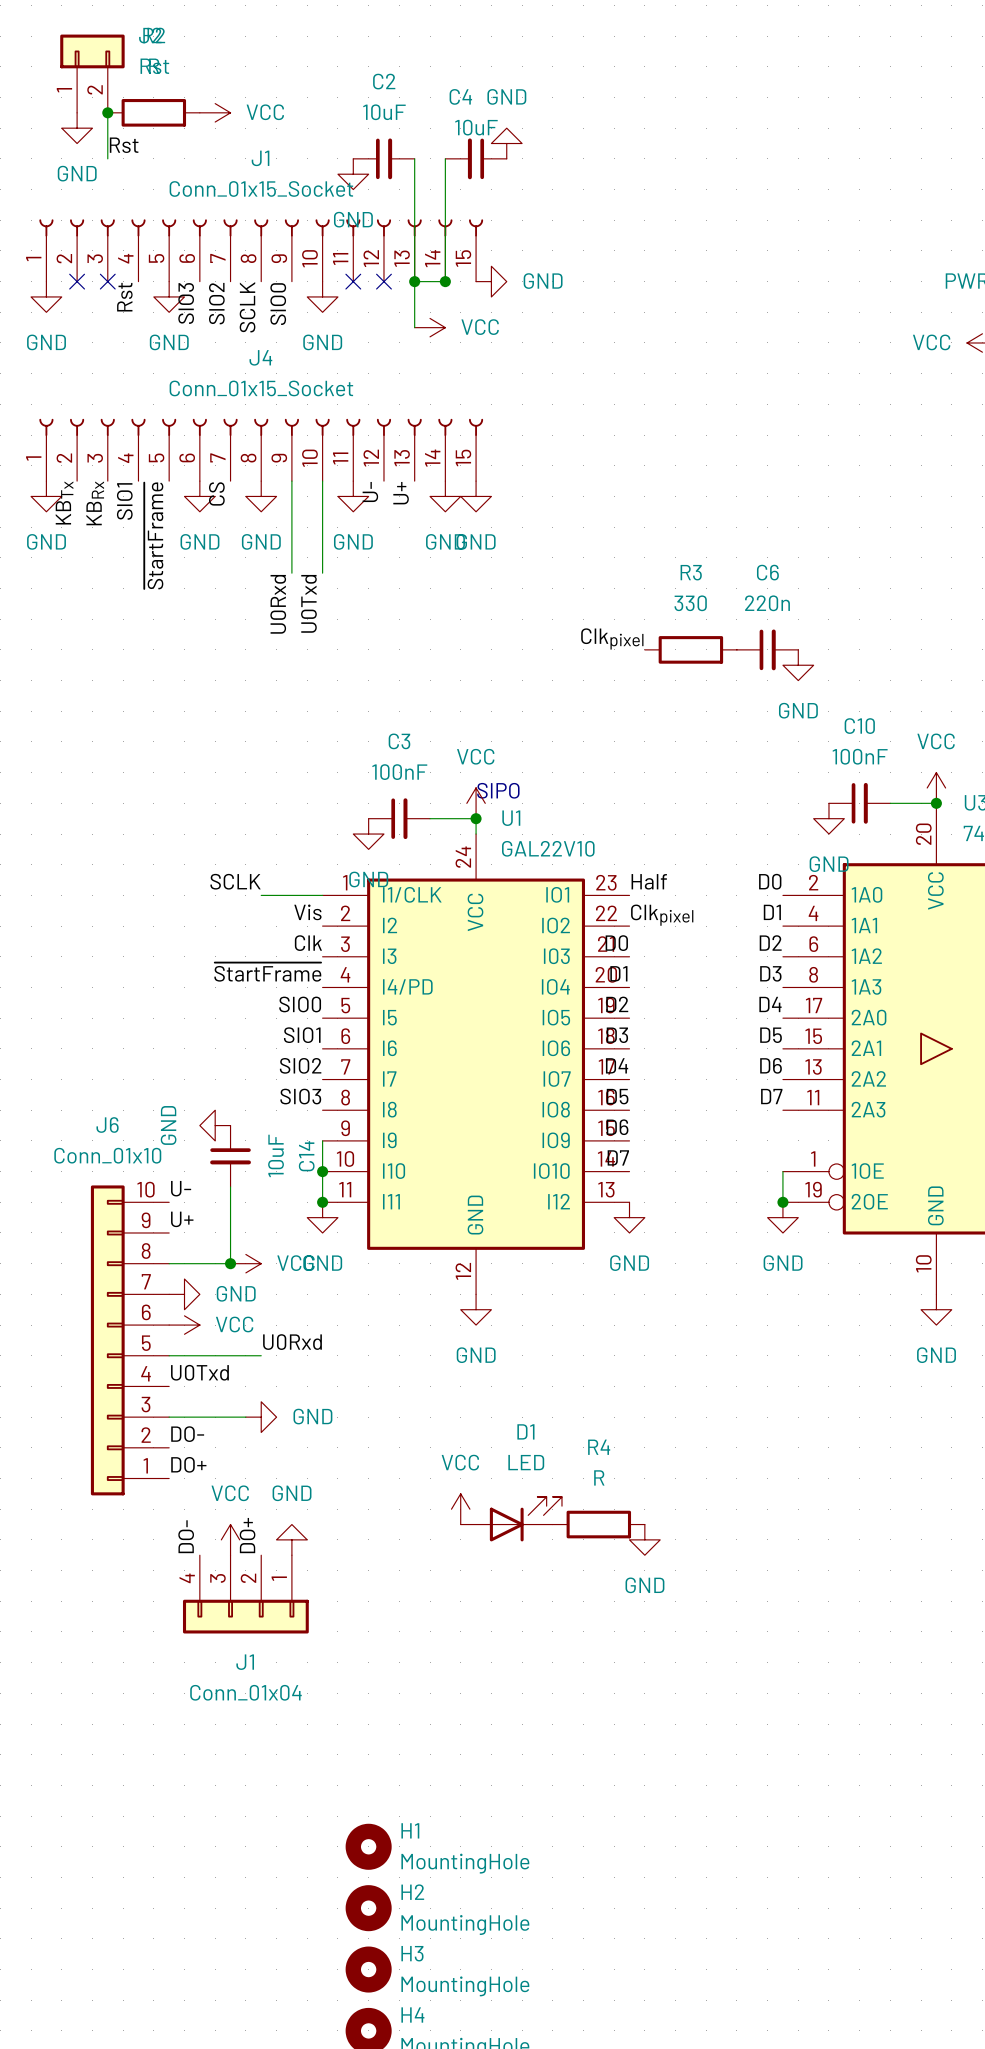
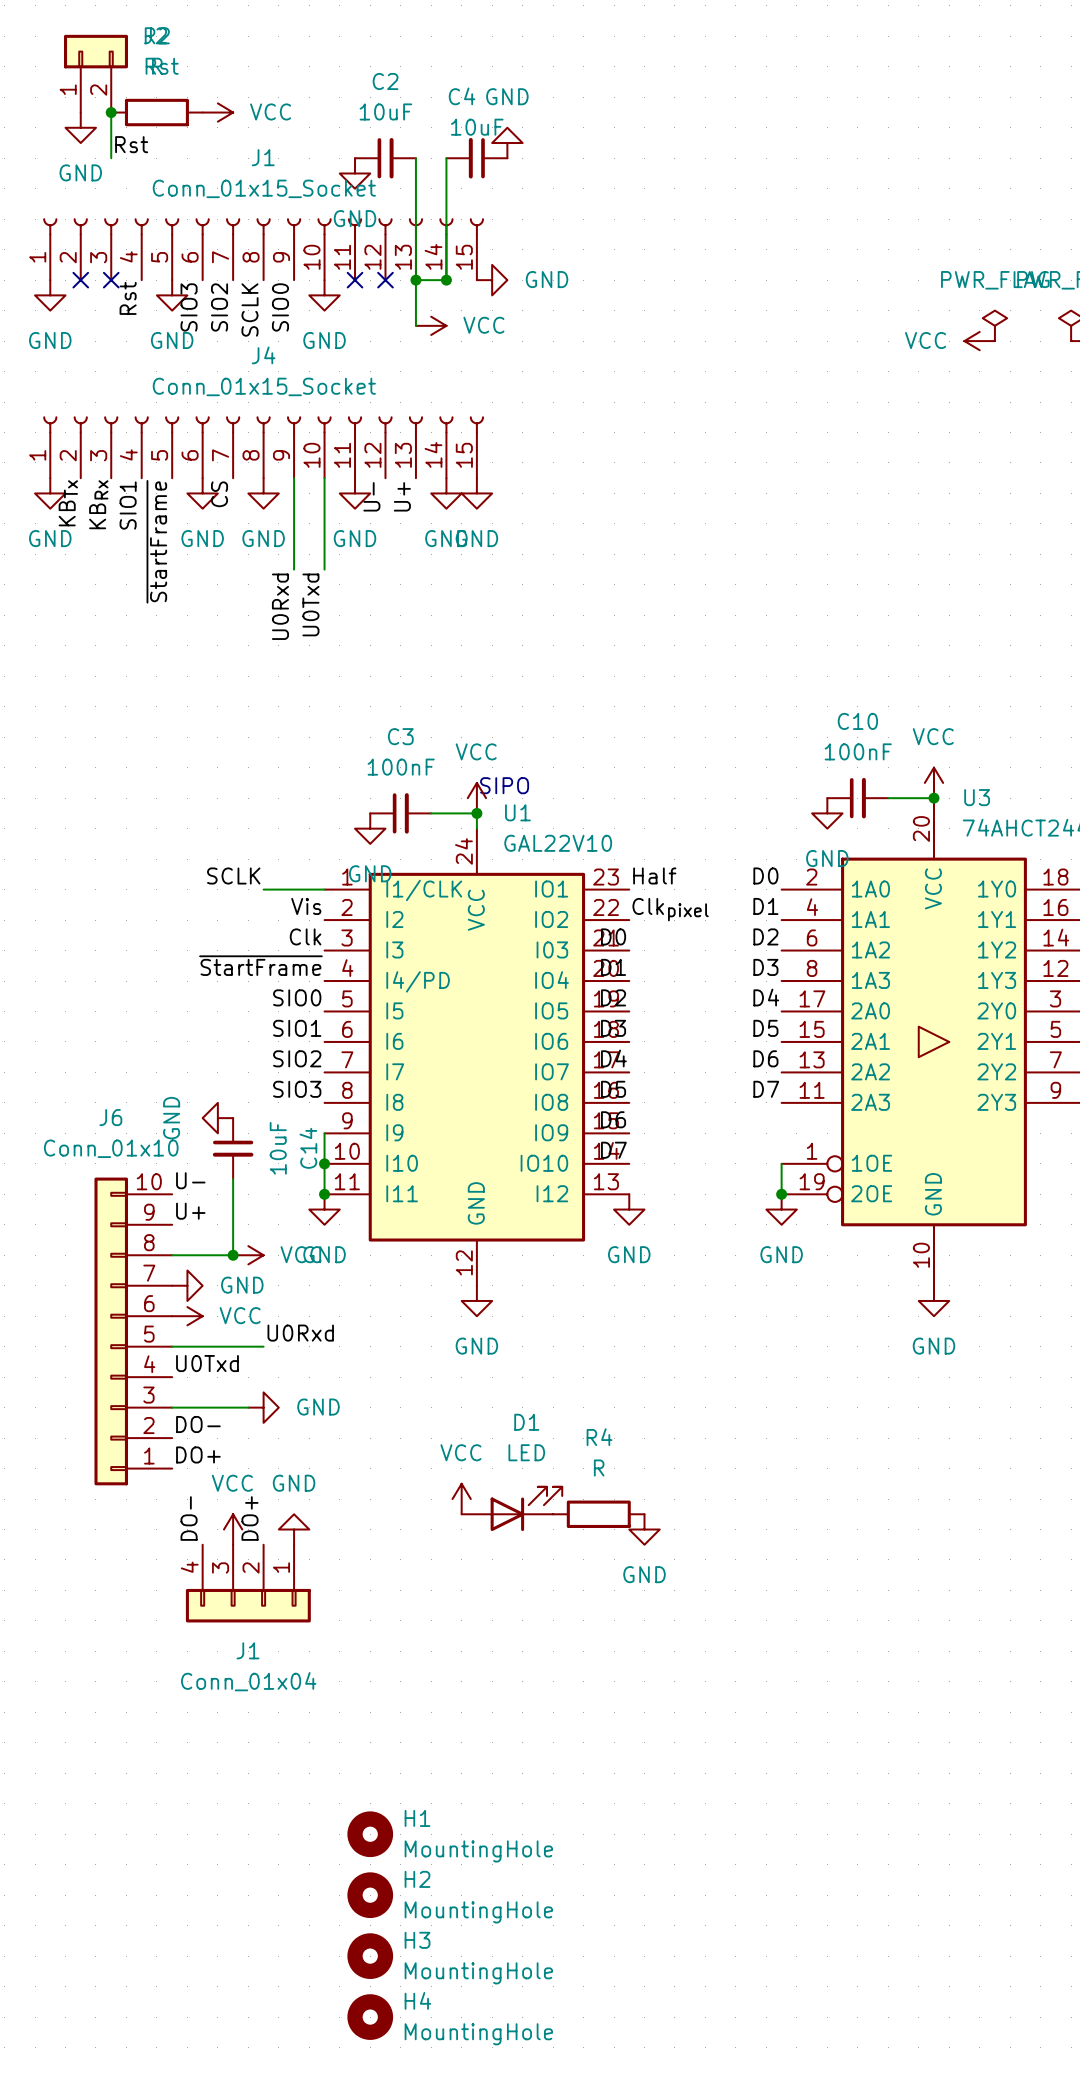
label: Clkpixel (612, 638) -> none
R3: 330 (690, 649) -> none
C6: 220n (767, 649) -> none
power symbol: GND (798, 665) -> none

